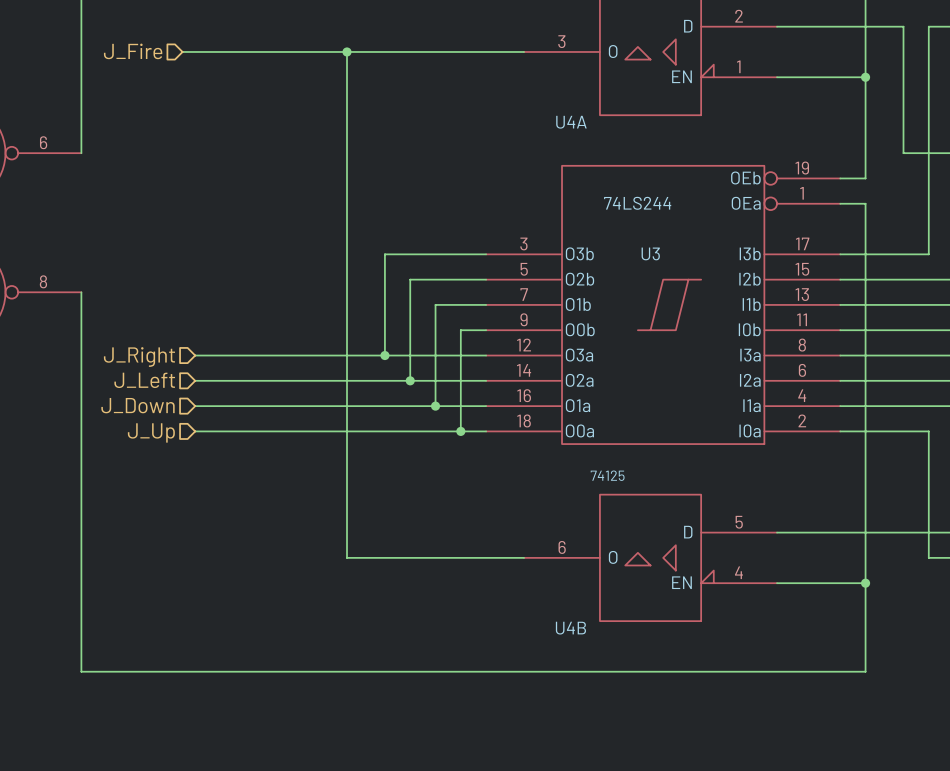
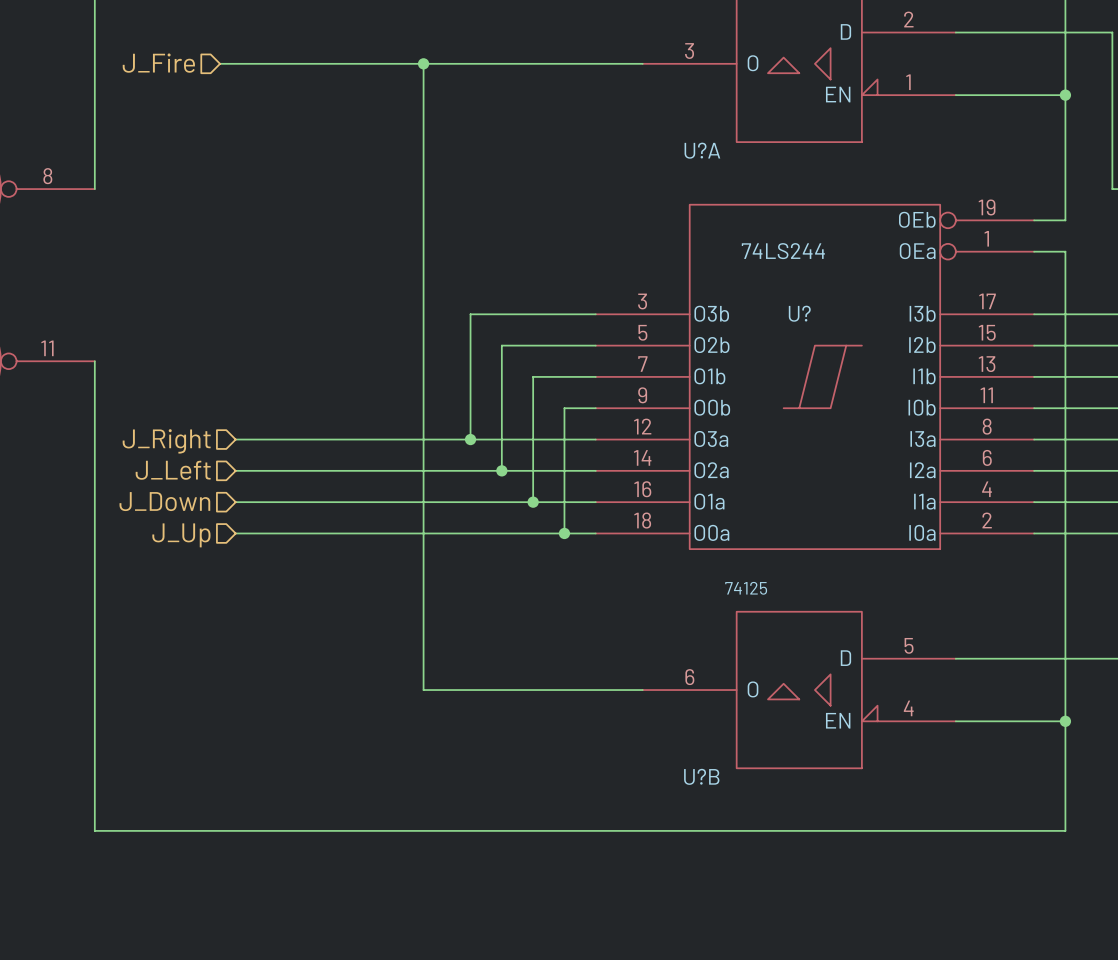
U4A name: U4A (571, 122) -> U?A (702, 150)
part pin number: 6 (43, 142) -> 8 (47, 176)
U3 name: U3 (650, 253) -> U? (799, 313)
part pin number: 8 (43, 281) -> 11 (47, 348)
U4B name: U4B (570, 628) -> U?B (701, 776)

